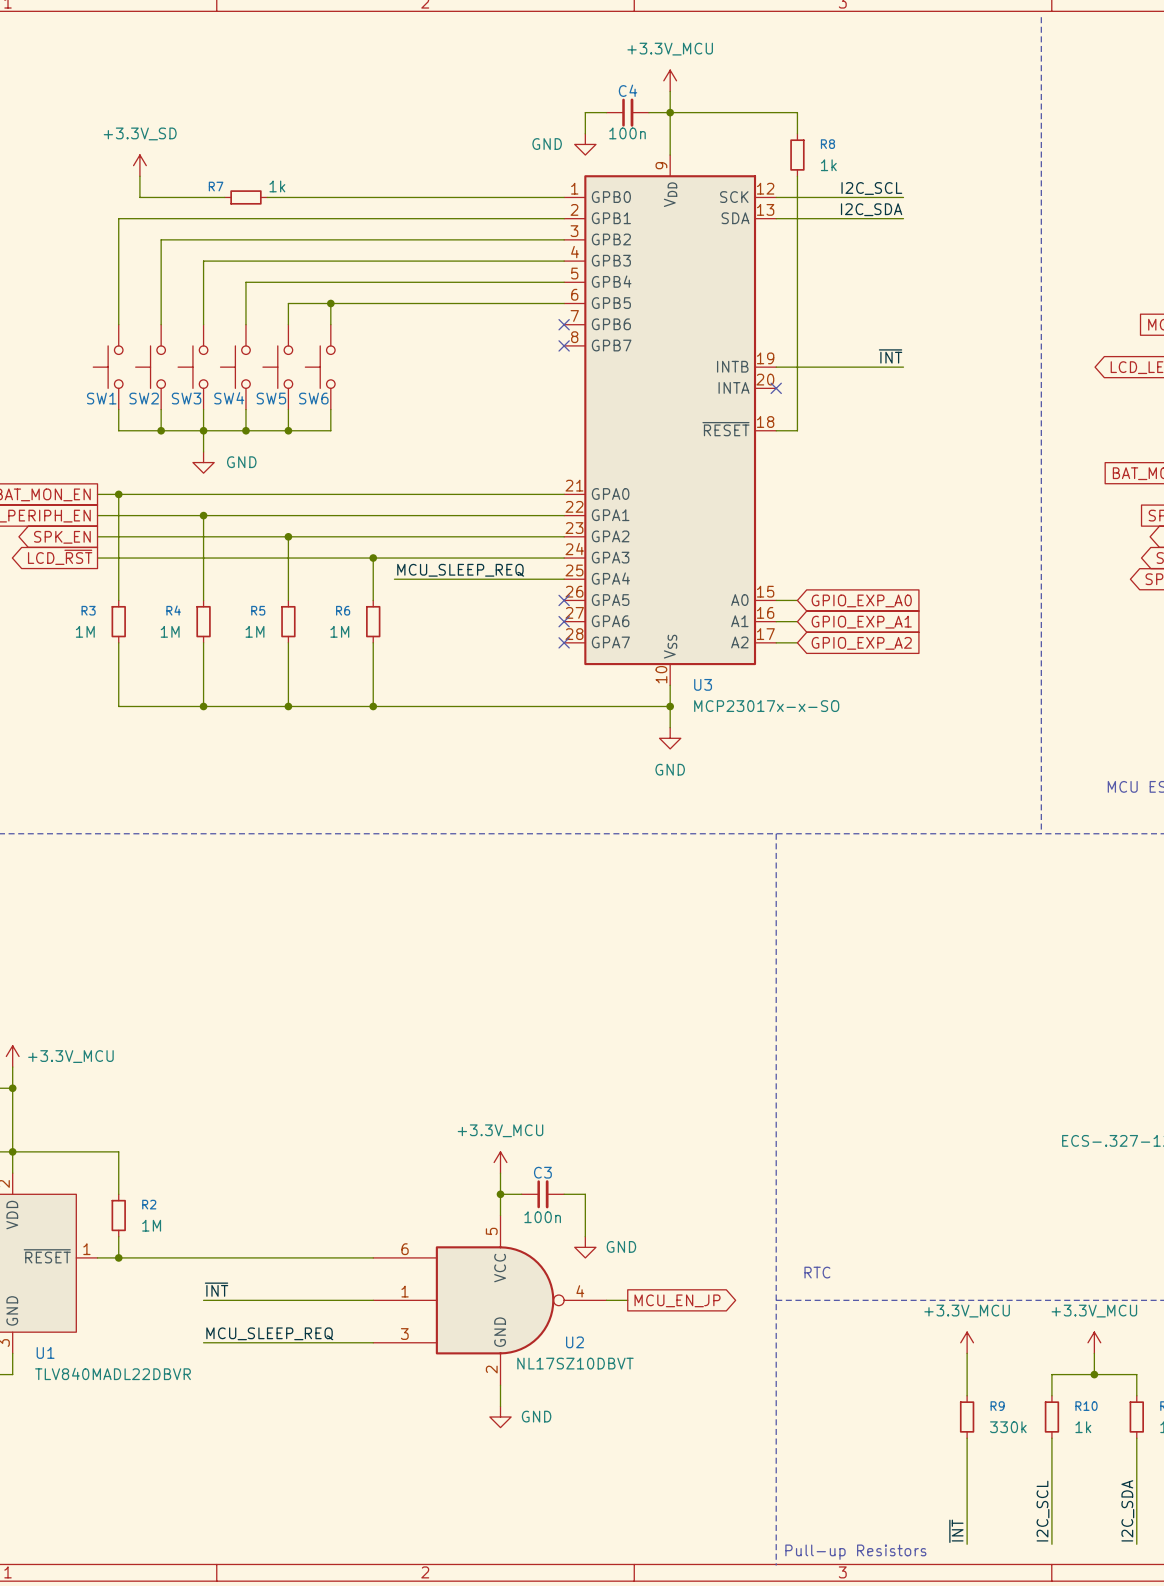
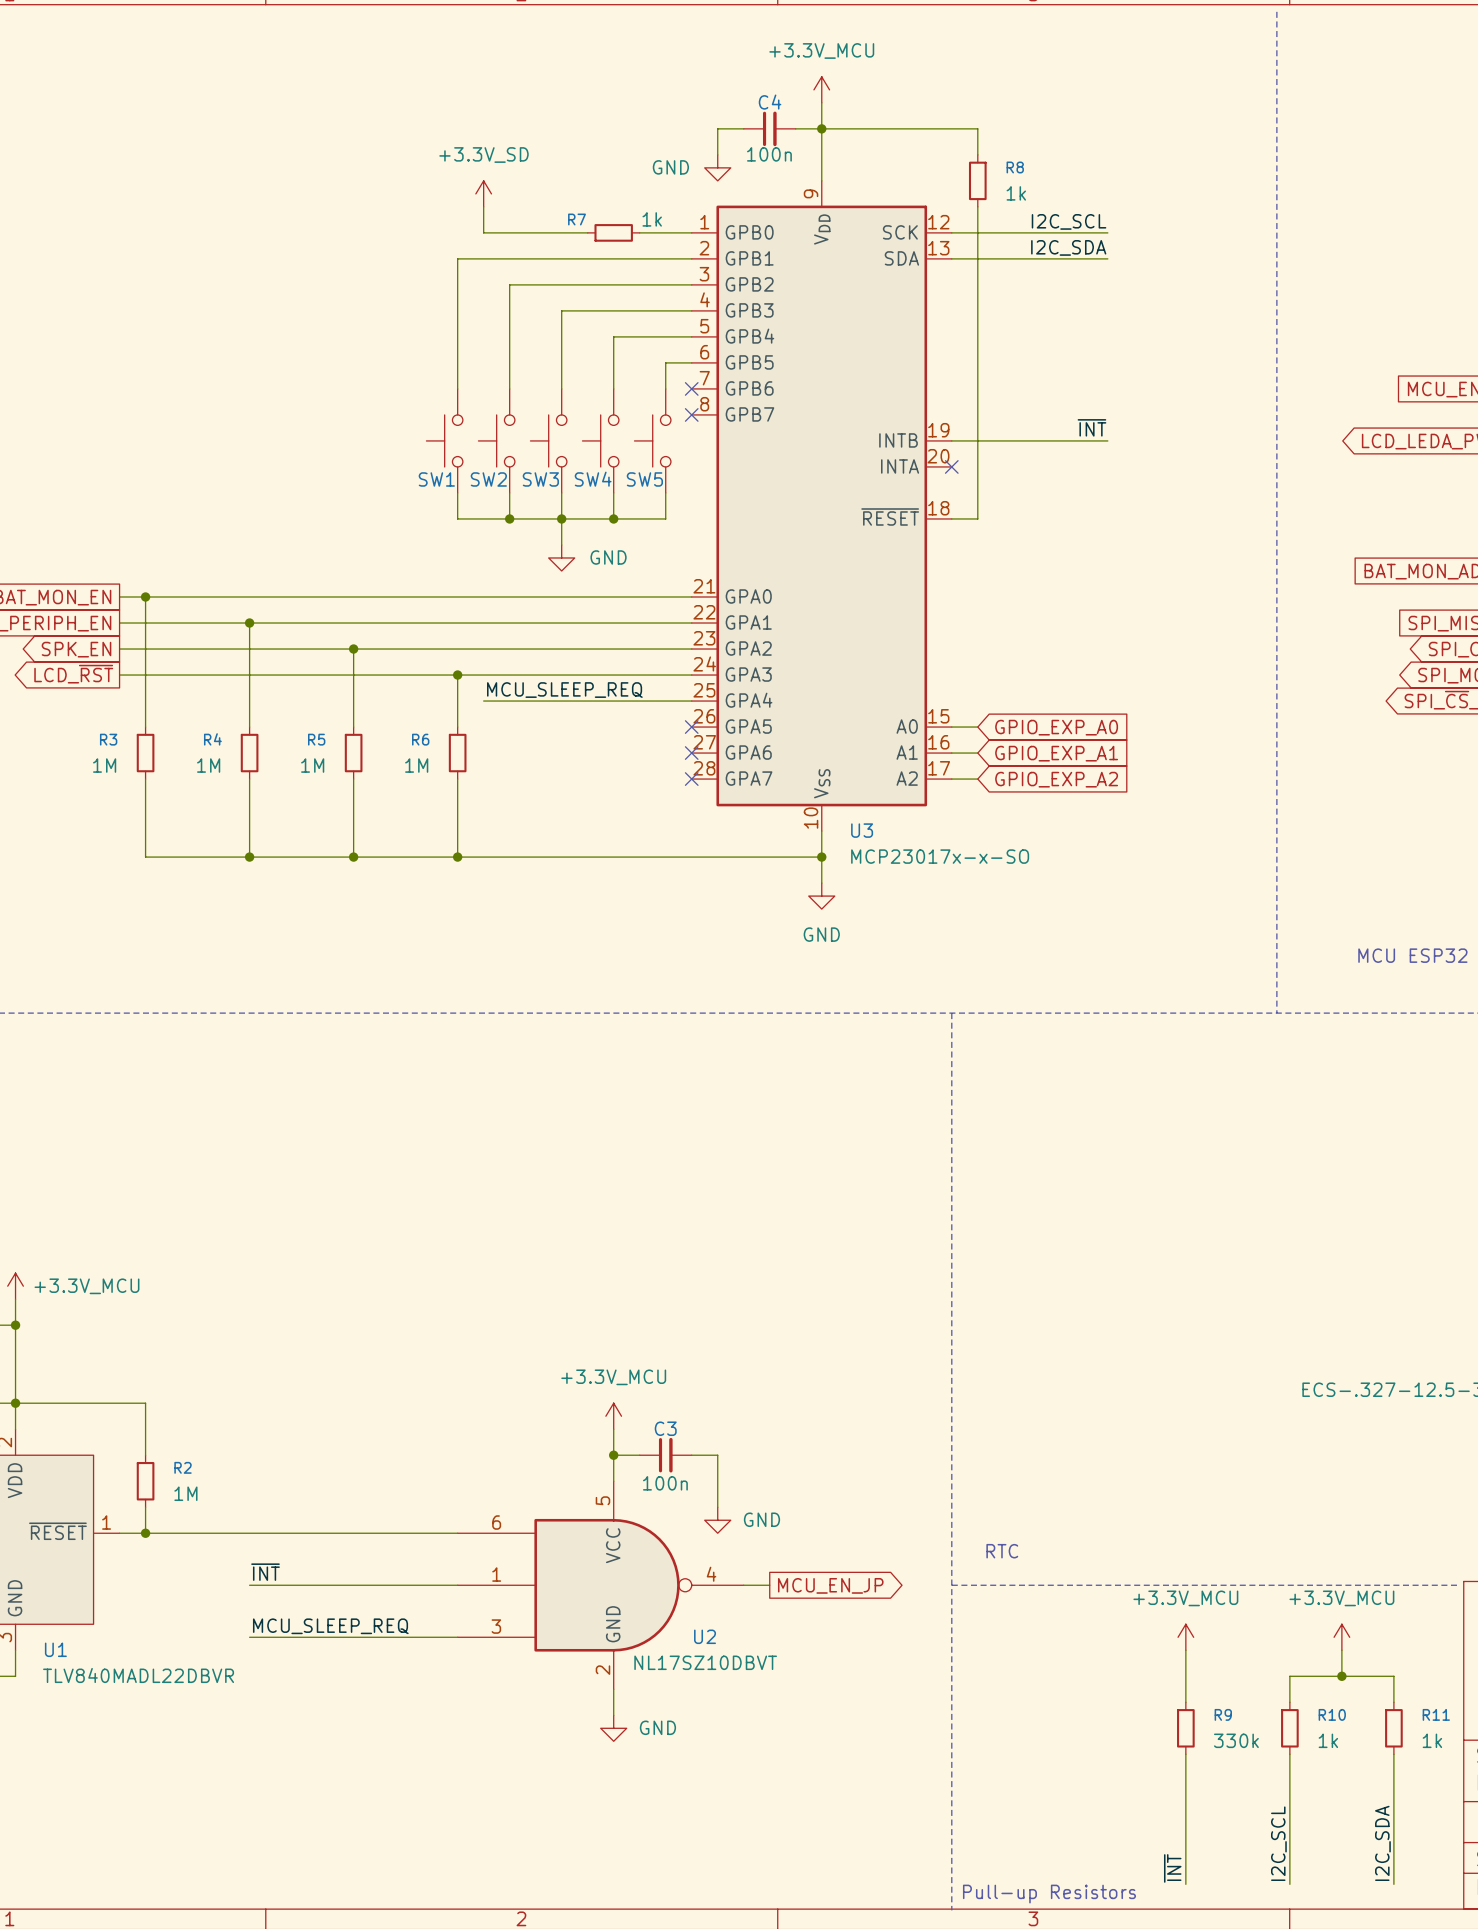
power symbol: +3.3V_SD (139, 165) -> none
power symbol: none -> +3.3V_SD (483, 193)
wire: (139, 176) (139, 197) (224, 197) -> none
R7 position: (245, 197) -> (613, 232)
wire: (267, 197) (394, 197) -> (483, 206) (483, 232)
wire: (479, 197) (521, 197) -> none
wire: (373, 218) (118, 218) (118, 324) -> (457, 258) (457, 388)
wire: (415, 239) (161, 239) (161, 324) -> (509, 284) (509, 388)
wire: (458, 261) (203, 261) (203, 324) -> (561, 310) (561, 388)
wire: (500, 282) (245, 282) (245, 324) -> (613, 336) (613, 388)
wire: (330, 303) (330, 324) -> (613, 492) (613, 518)
junction: (330, 303) -> none
wire: (542, 303) (288, 303) (288, 324) -> (665, 362) (665, 388)
SW1 position: (108, 367) -> (444, 440)
SW2 position: (150, 367) -> (496, 440)
SW3 position: (192, 367) -> (548, 440)
SW4 position: (235, 367) -> (600, 440)
SW5 position: (277, 367) -> (652, 440)
SW6: (320, 367) -> none
wire: (118, 409) (118, 430) (330, 430) (330, 409) -> none
wire: (161, 409) (161, 430) -> none
wire: (203, 409) (203, 451) -> none
wire: (245, 409) (245, 430) -> none
wire: (288, 409) (288, 430) -> (509, 492) (509, 518)
wire: none -> (457, 492) (457, 518) (665, 518) (665, 492)
wire: none -> (561, 492) (561, 544)
junction: (161, 430) -> none
junction: (203, 430) -> none
junction: (245, 430) -> none
junction: (288, 430) -> none
junction: none -> (509, 518)
junction: none -> (561, 518)
junction: none -> (613, 518)
power symbol: GND (203, 462) -> none
power symbol: none -> GND (561, 557)

